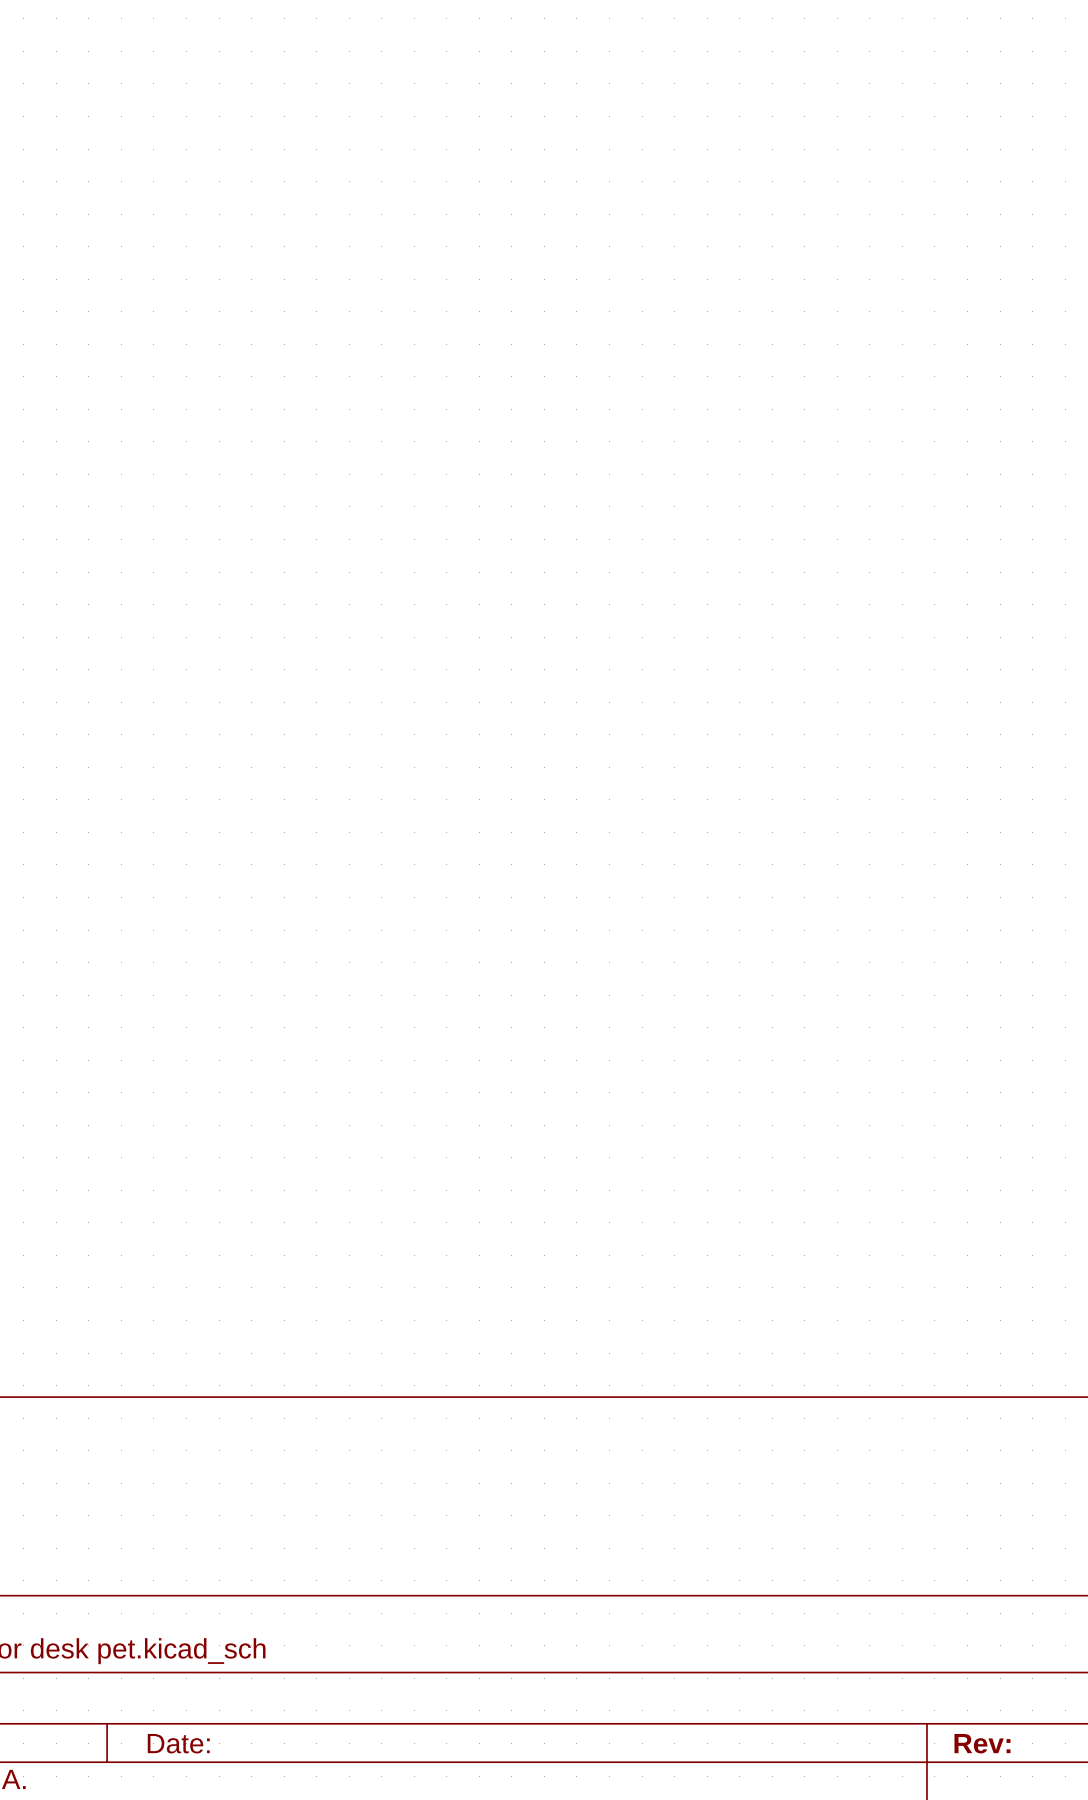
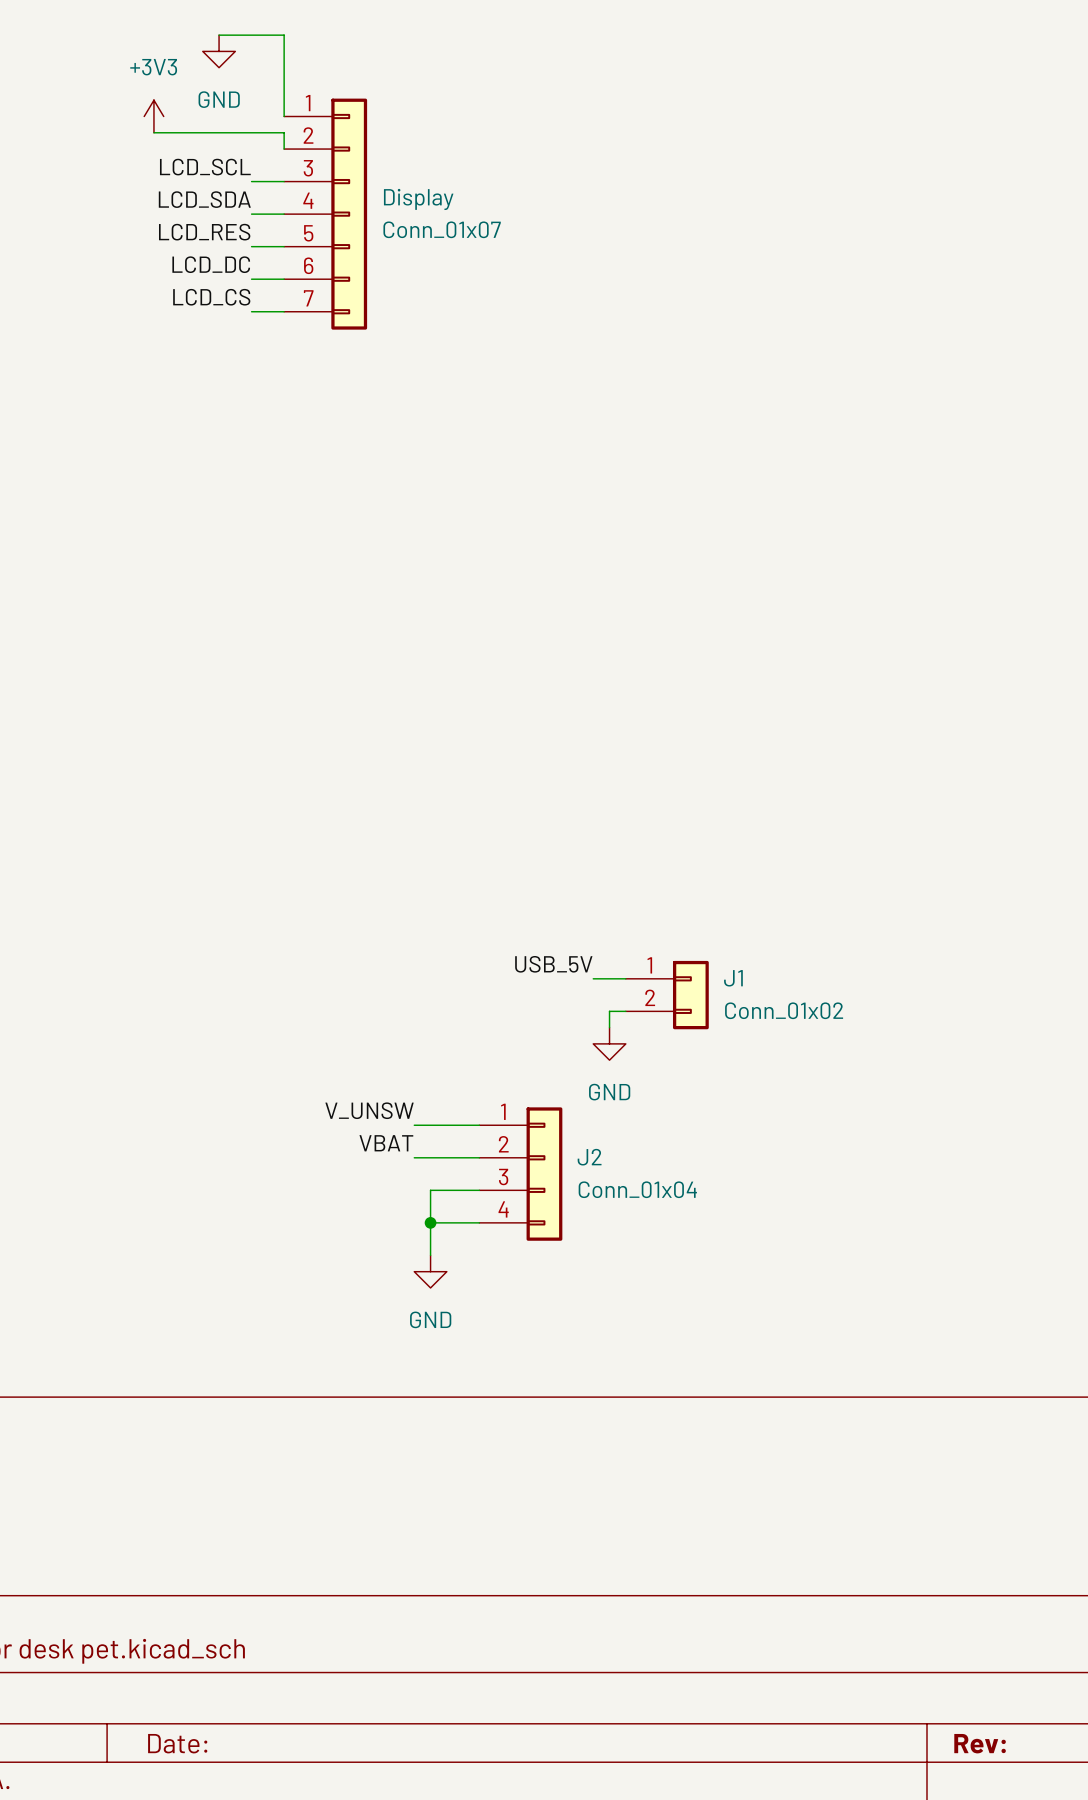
wire: none -> (219, 35) (284, 35) (284, 116)
power symbol: none -> GND (219, 51)
power symbol: none -> +3V3 (153, 116)
wire: none -> (153, 132) (284, 132) (284, 149)
label: none -> LCD_SCL (205, 167)
wire: none -> (251, 181) (284, 181)
label: none -> LCD_SDA (204, 199)
wire: none -> (251, 214) (284, 214)
Display: none -> Conn_01x07 (325, 214)
label: none -> LCD_RES (204, 232)
wire: none -> (251, 246) (284, 246)
label: none -> LCD_DC (211, 264)
wire: none -> (251, 279) (284, 279)
label: none -> LCD_CS (211, 297)
wire: none -> (251, 311) (284, 311)
label: none -> USB_5V (553, 964)
wire: none -> (593, 978) (625, 978)
J1: none -> Conn_01x02 (667, 995)
wire: none -> (625, 1011) (609, 1011) (609, 1027)
power symbol: none -> GND (609, 1043)
label: none -> V_UNSW (369, 1110)
wire: none -> (414, 1125) (479, 1125)
label: none -> VBAT (386, 1143)
wire: none -> (414, 1157) (479, 1157)
J2: none -> Conn_01x04 (520, 1174)
wire: none -> (479, 1190) (430, 1190) (430, 1255)
wire: none -> (430, 1222) (479, 1222)
junction: none -> (430, 1222)
power symbol: none -> GND (430, 1271)

